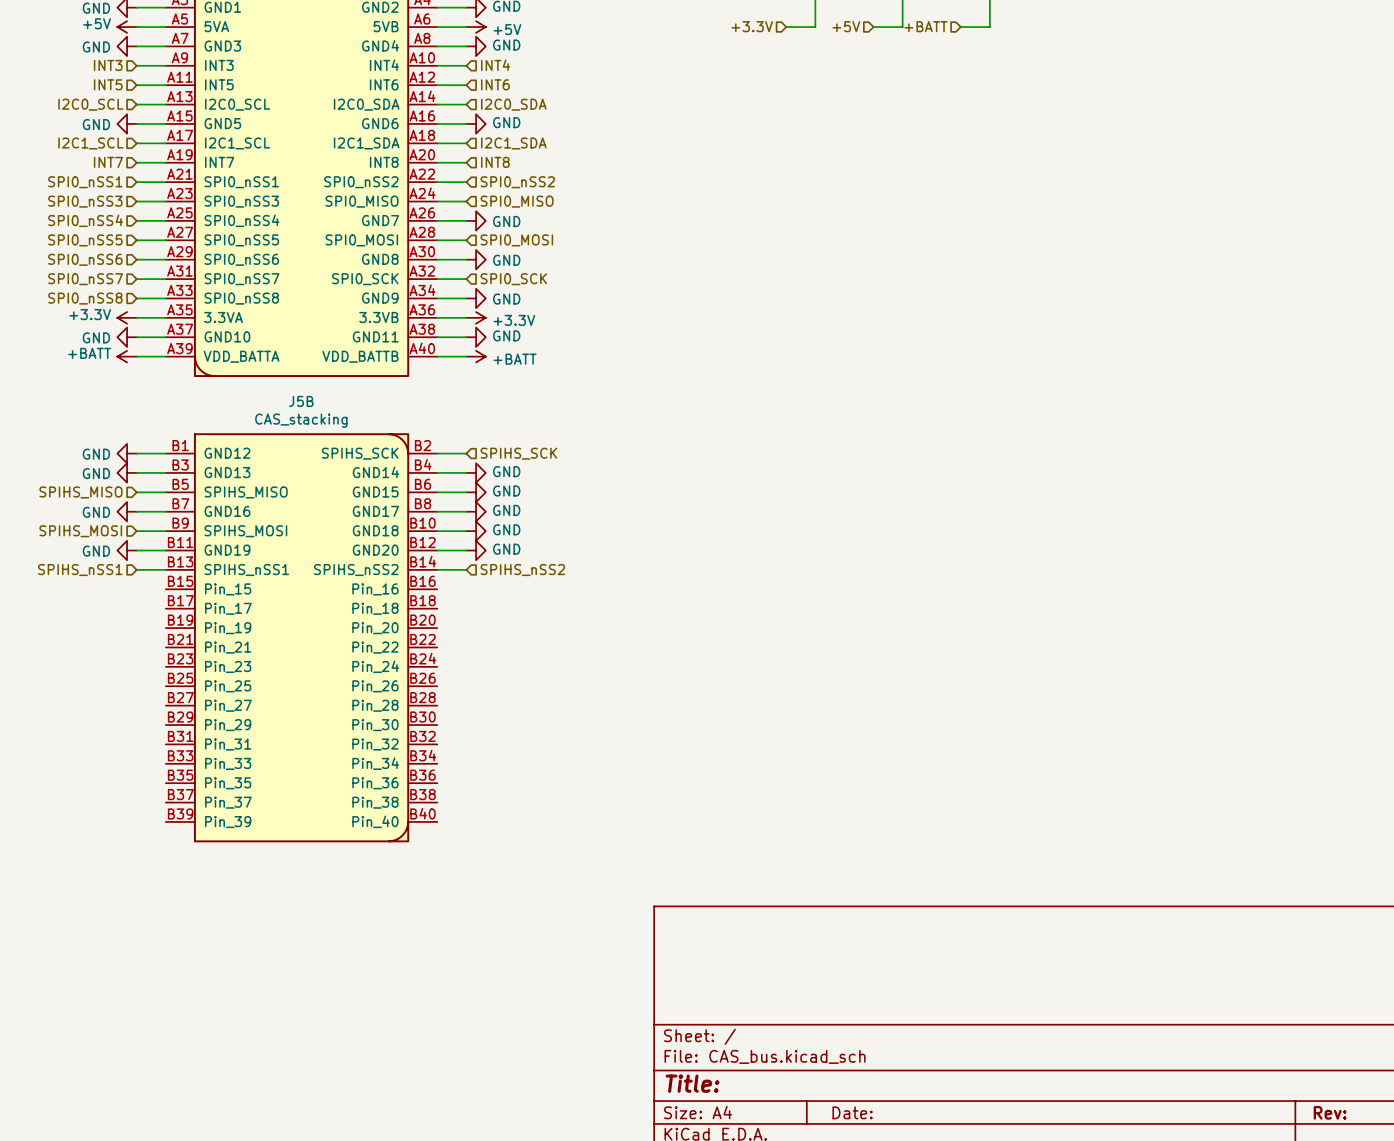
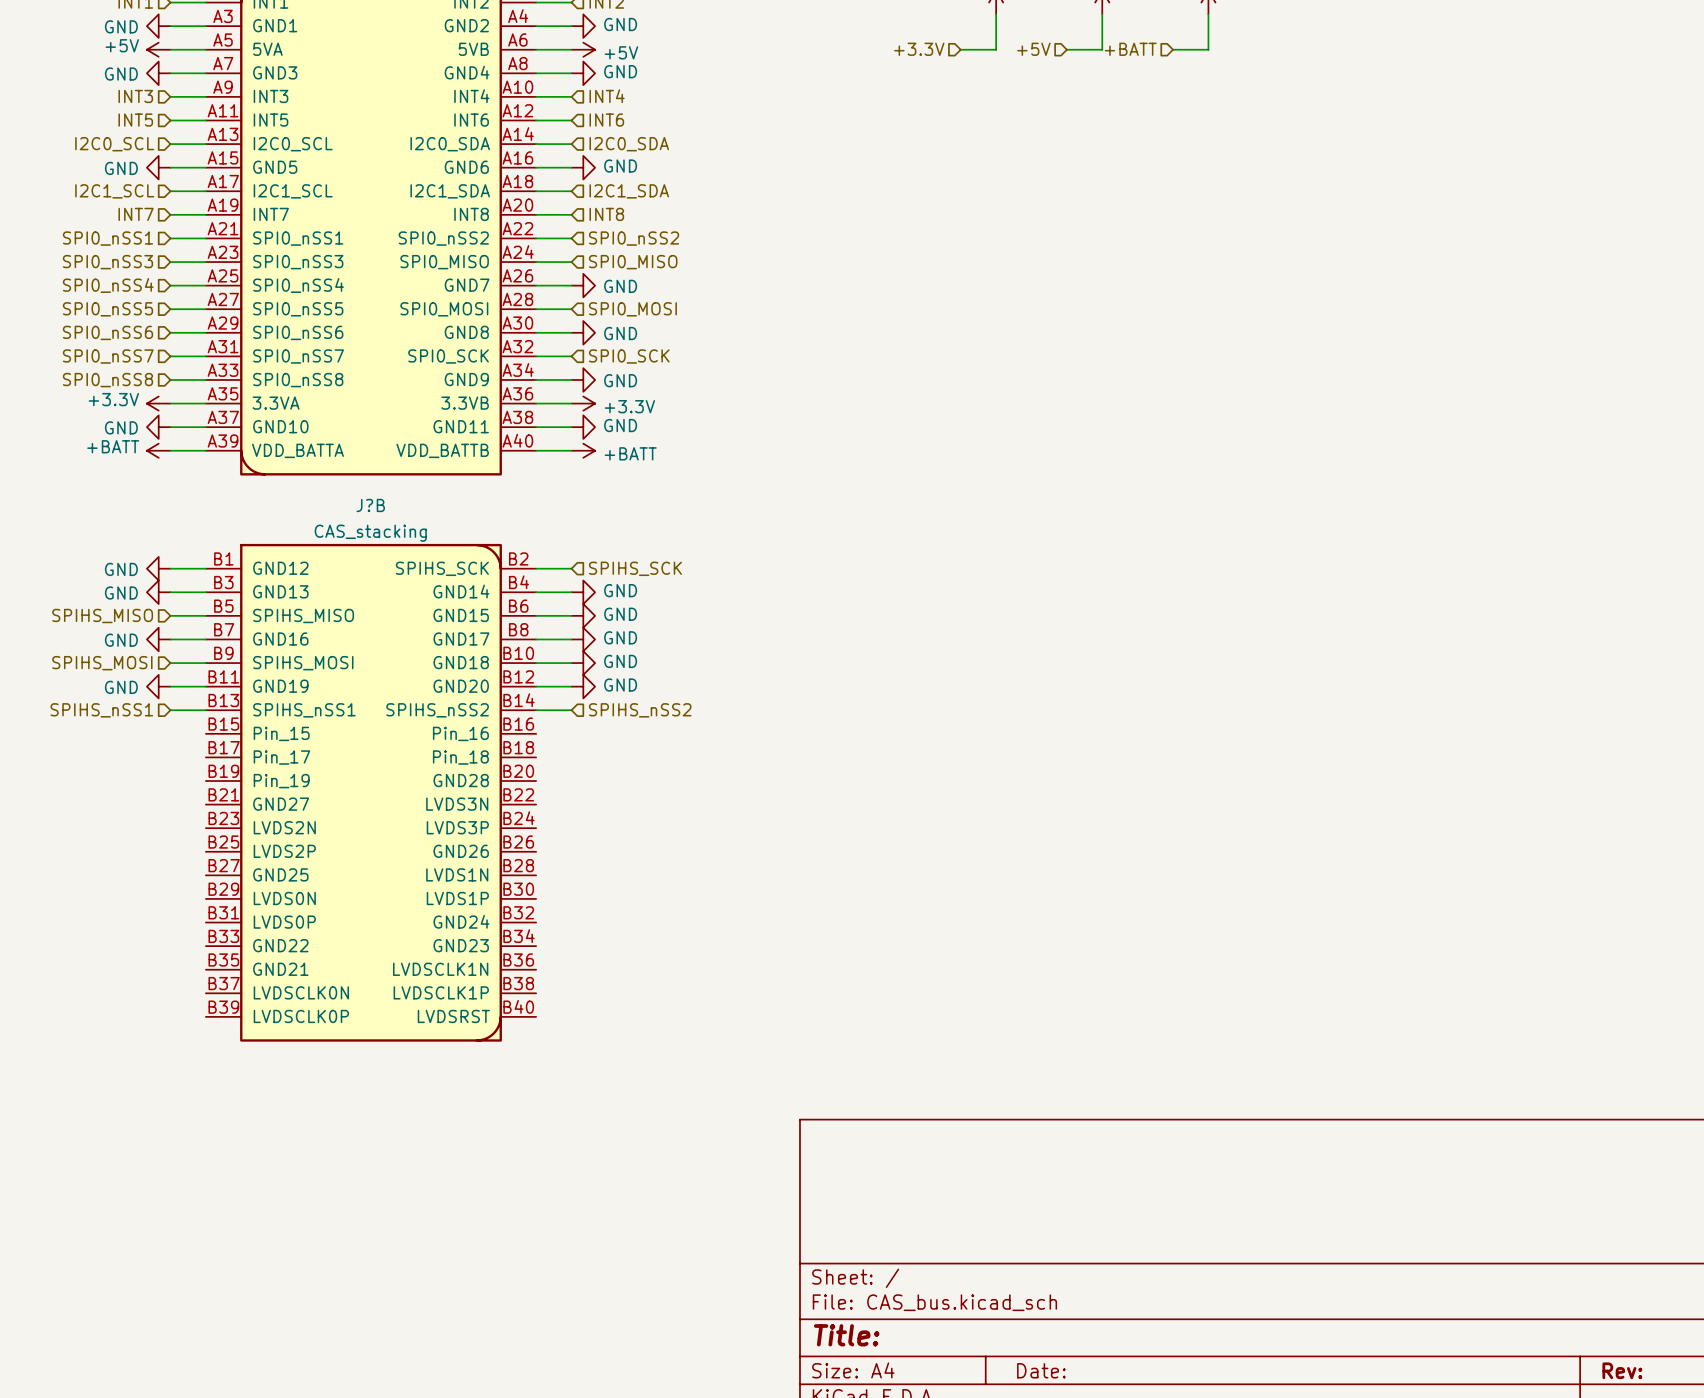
J5B name: J5B (301, 401) -> J?B (370, 505)
J5B symbol: [165, 433, 438, 843] -> [205, 543, 537, 1042]

